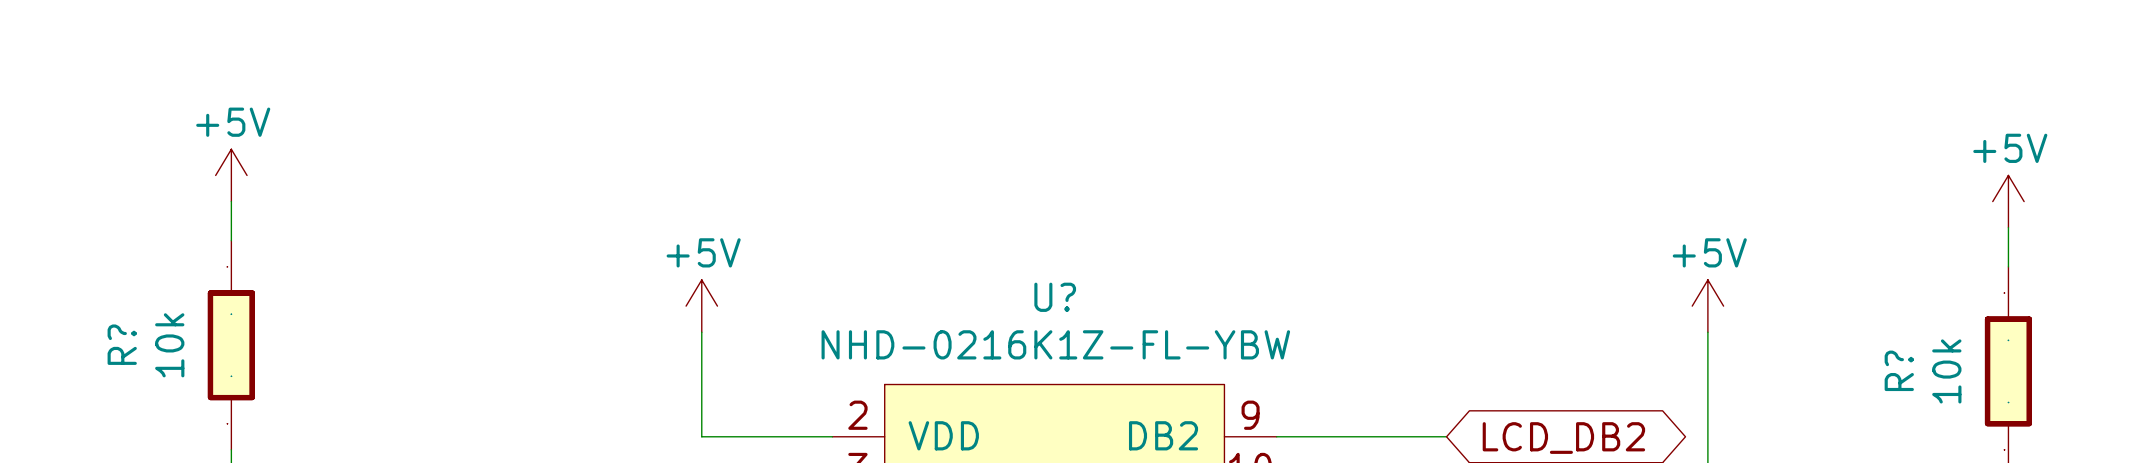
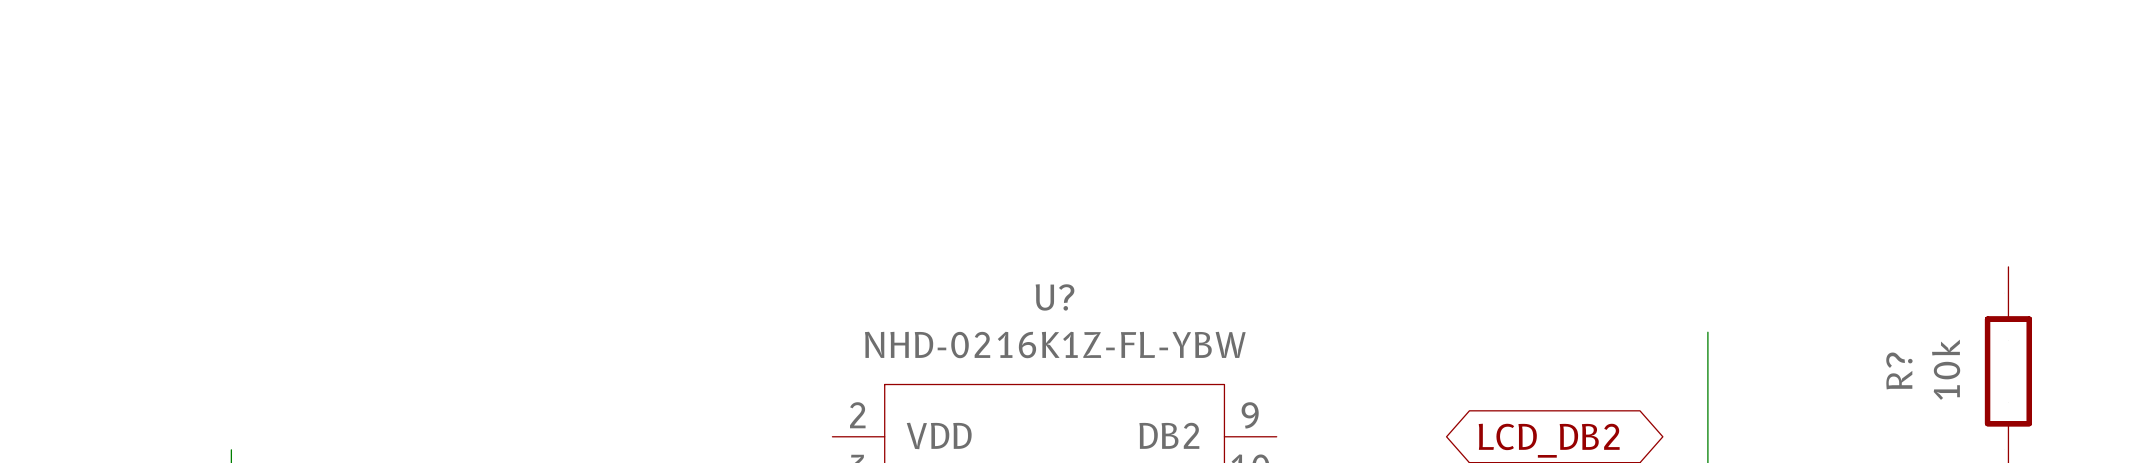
power symbol: +5V (231, 175) -> none
wire: (231, 201) (231, 240) -> none
power symbol: +5V (2008, 201) -> none
wire: (2008, 227) (2008, 266) -> none
power symbol: +5V (701, 306) -> none
power symbol: +5V (1707, 306) -> none
wire: (701, 332) (701, 436) (832, 436) -> none
R?: (231, 345) -> none
wire: (1276, 436) (1446, 436) -> none

